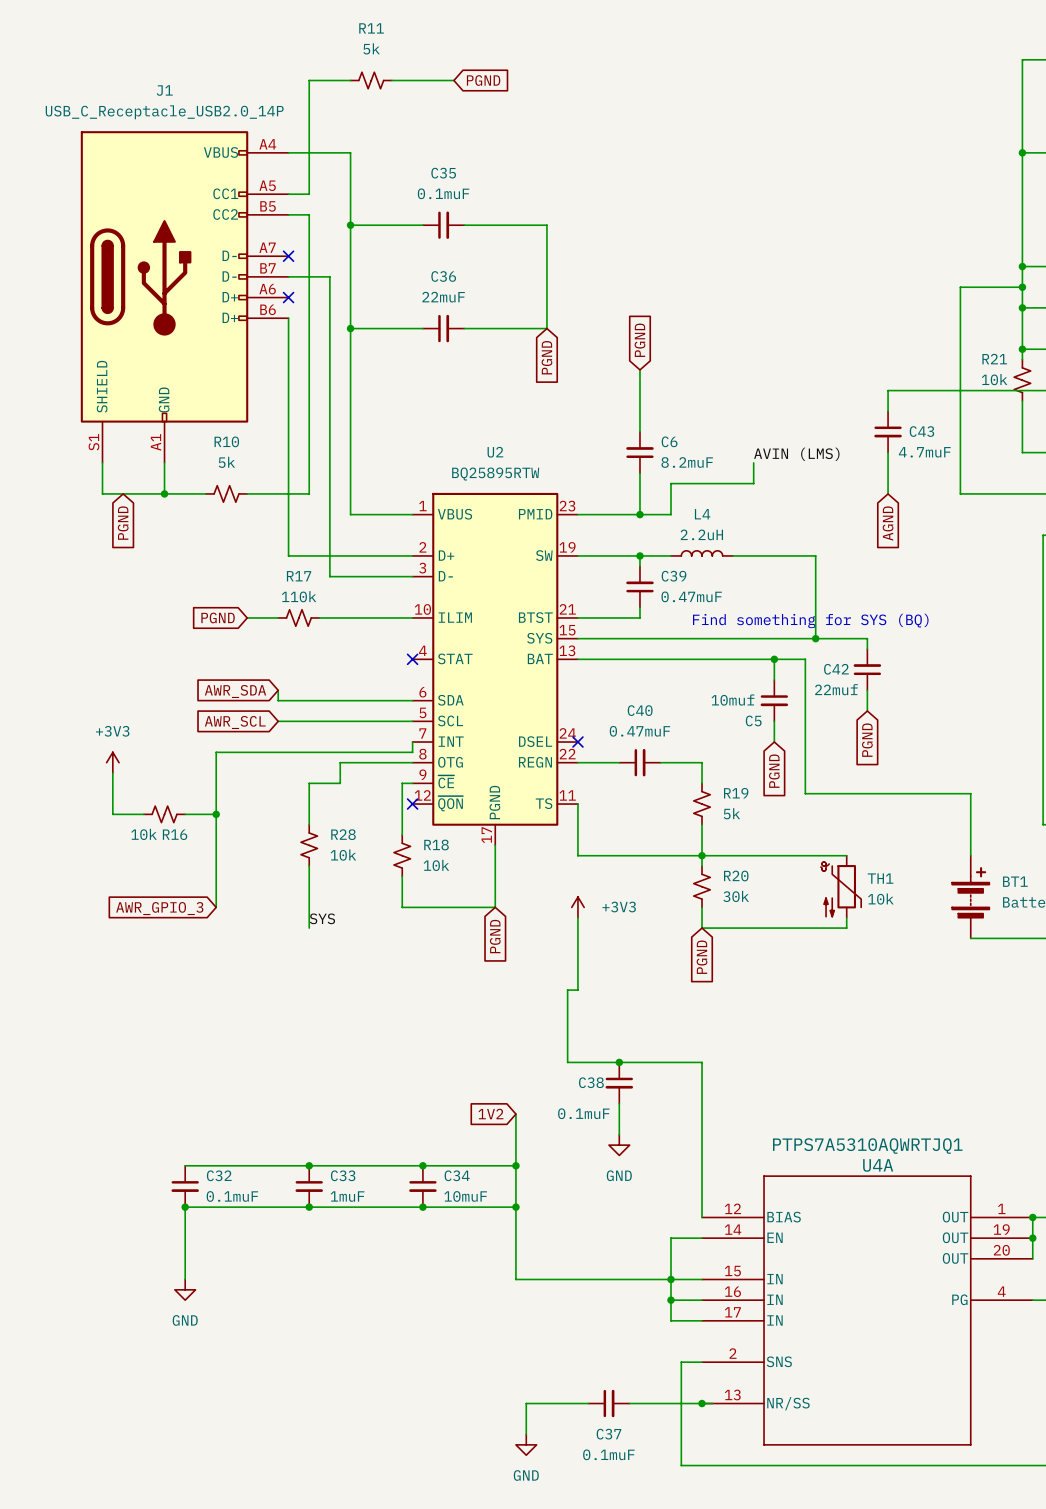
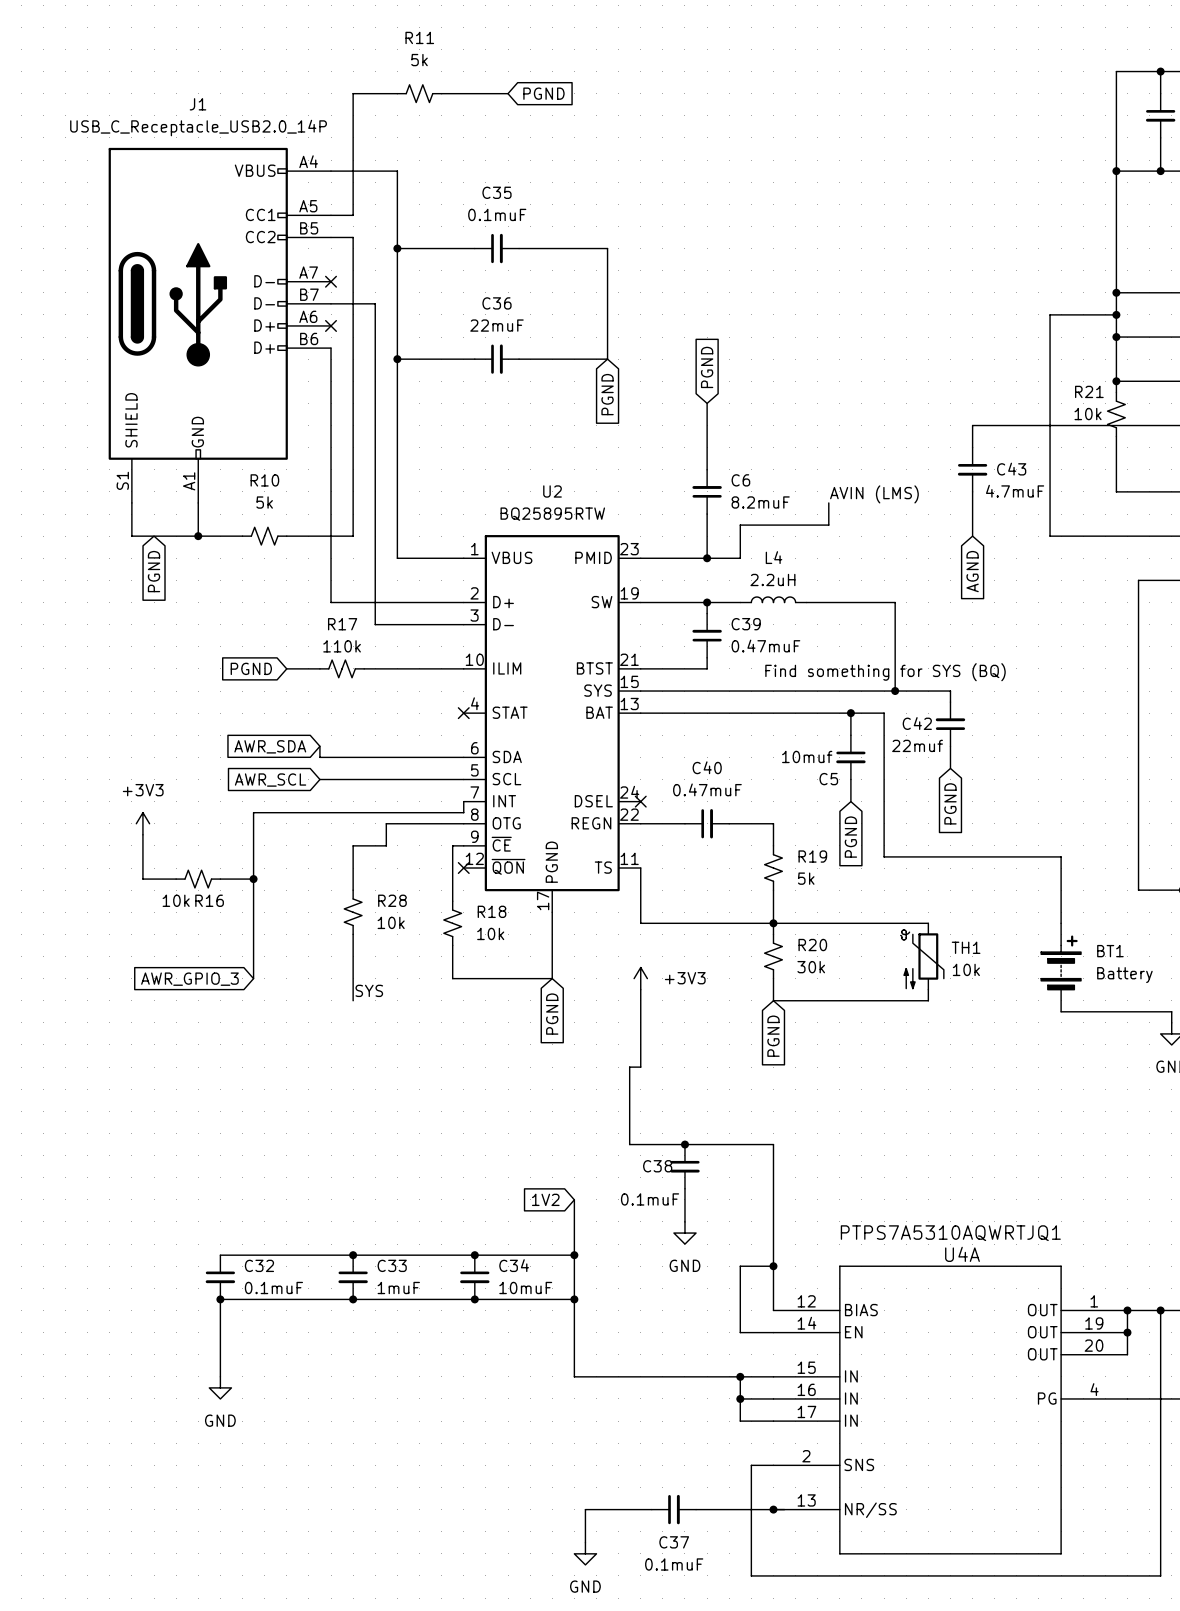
junction: none -> (773, 1266)
wire: (670, 1238) (670, 1279) -> (740, 1332) (740, 1266) (773, 1266)

